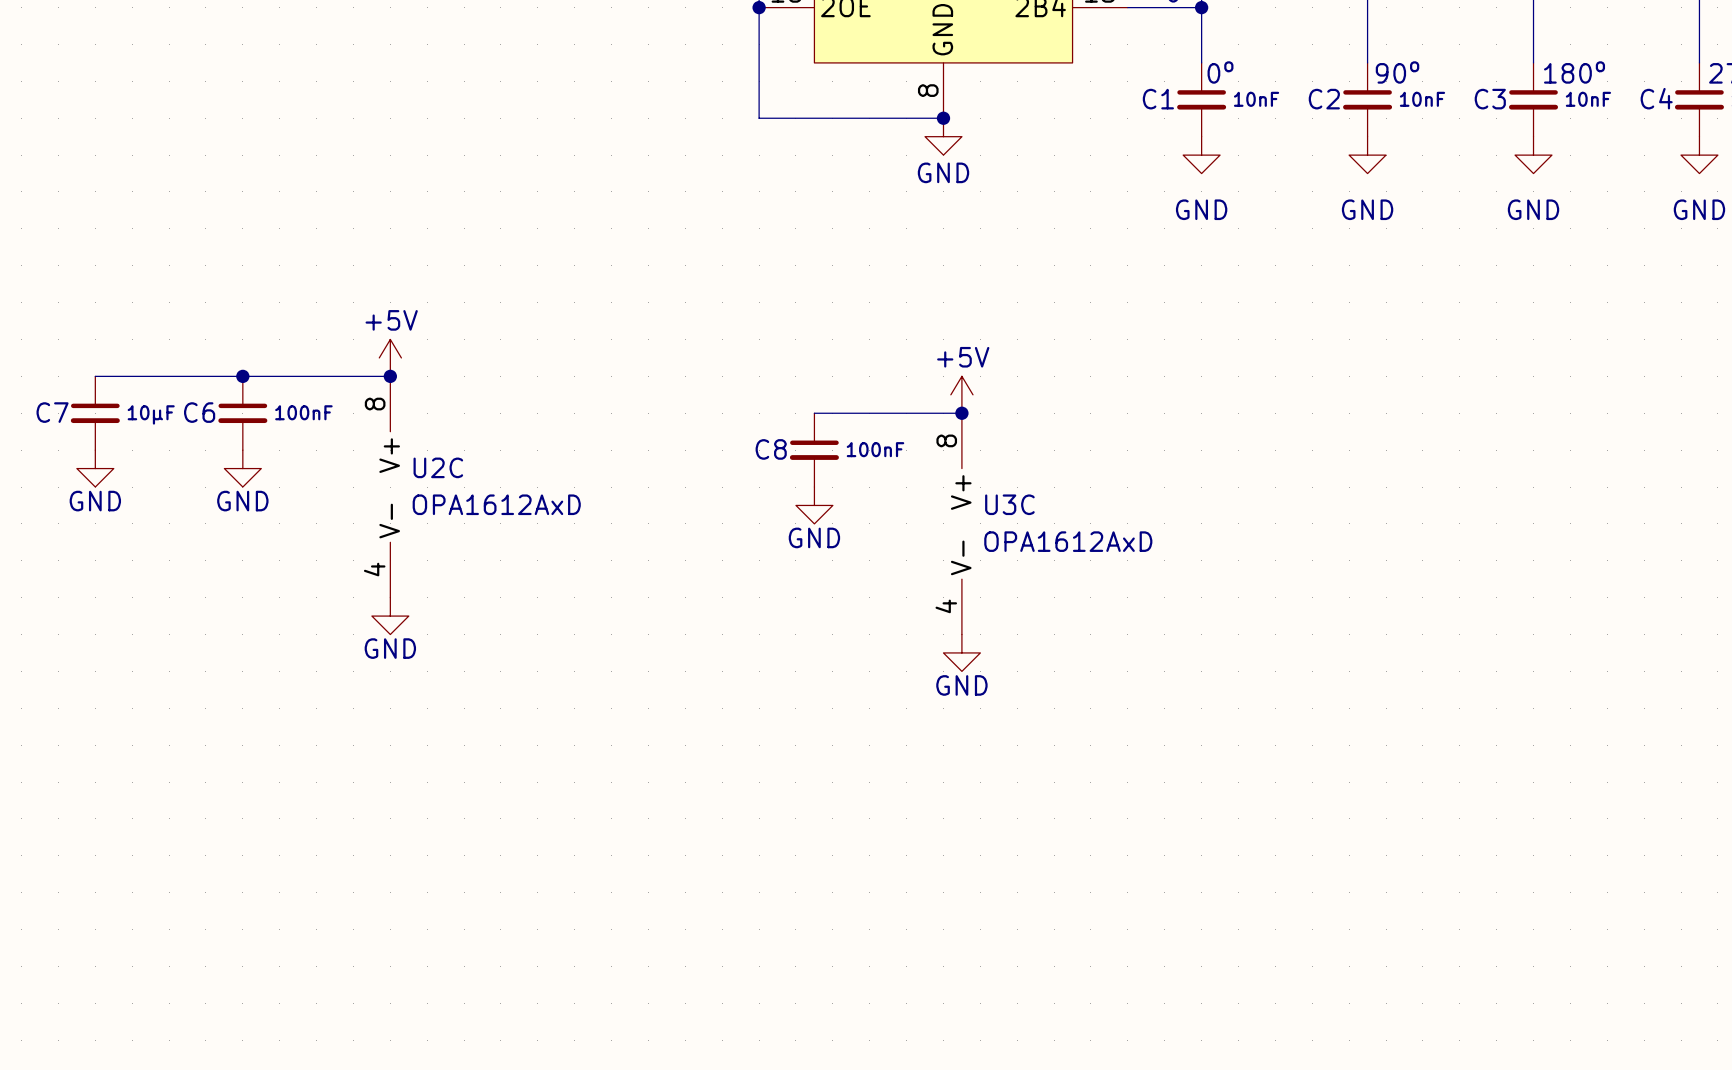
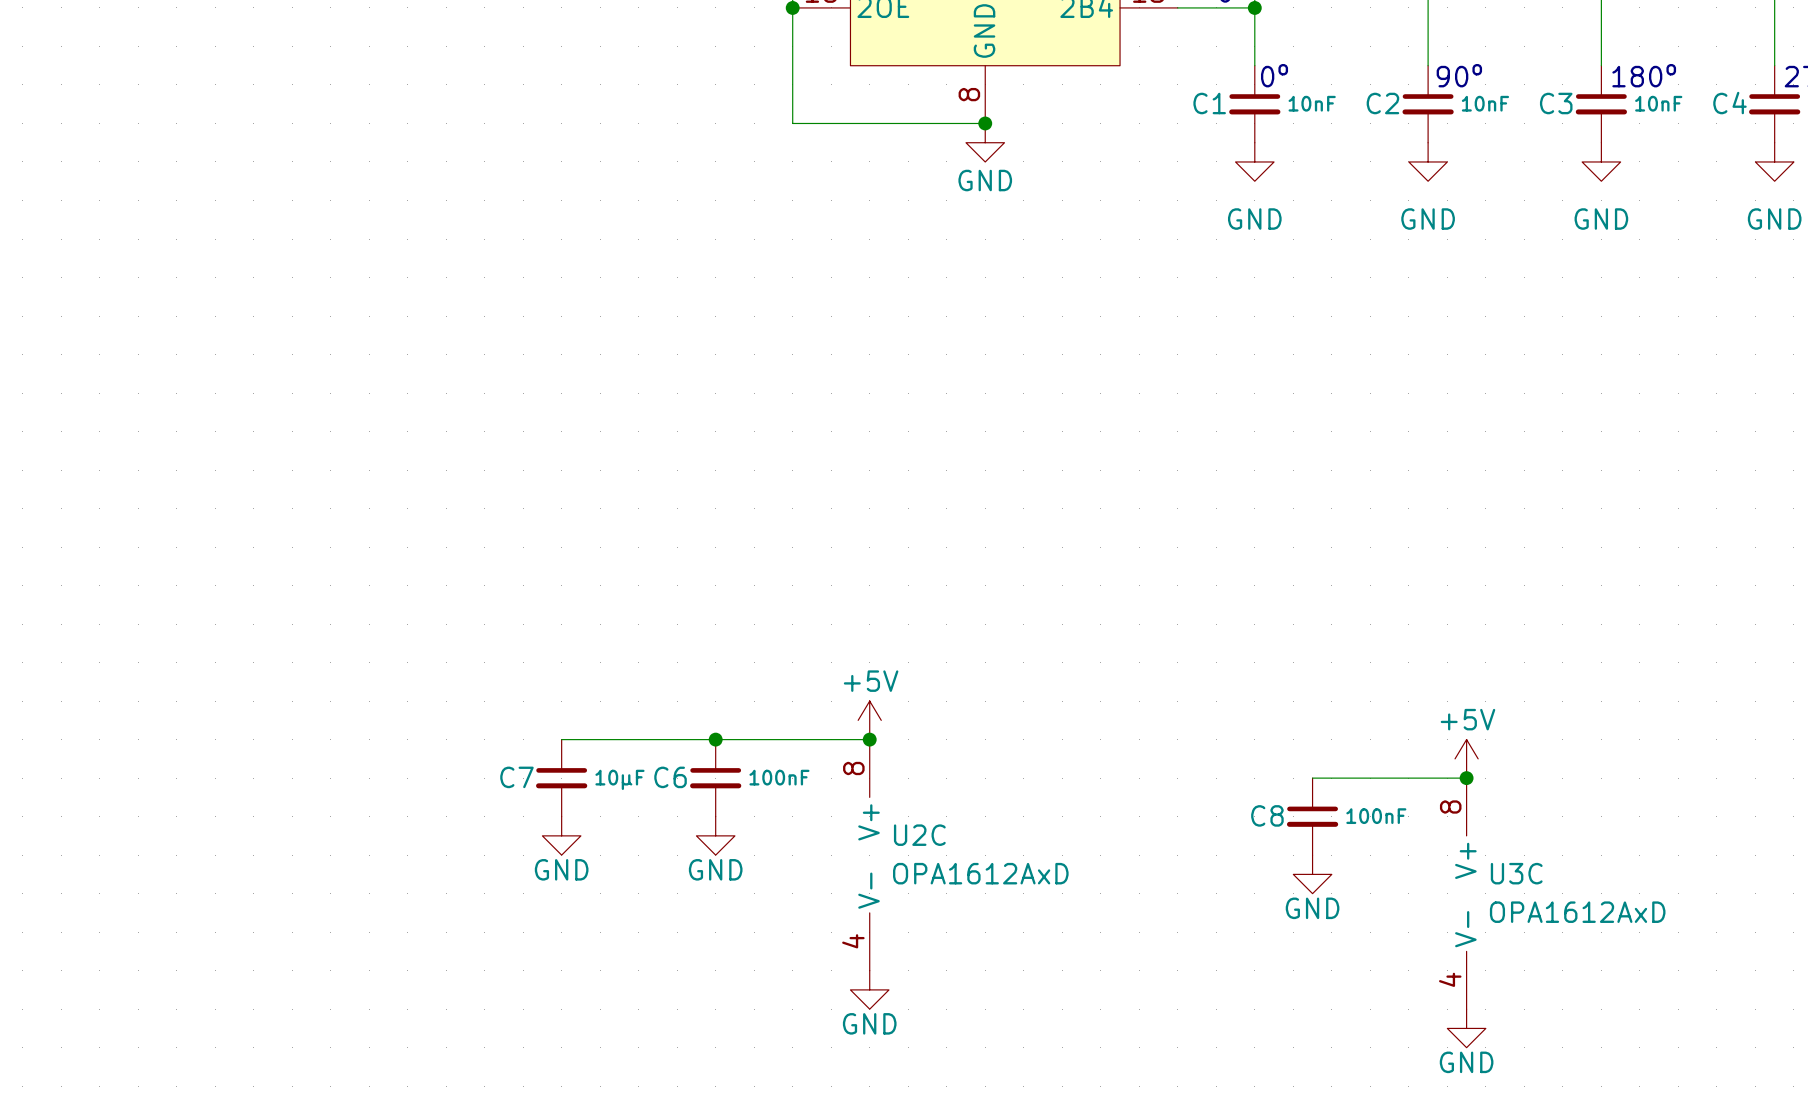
power symbol: +5V (390, 357) -> none
wire: (95, 376) (390, 376) -> none
junction: (242, 376) -> none
junction: (390, 376) -> none
power symbol: +5V (961, 394) -> none
C7 position: (95, 413) -> (561, 778)
C6 position: (242, 413) -> (715, 778)
wire: (814, 413) (961, 413) -> none
junction: (961, 413) -> none
C8 position: (814, 450) -> (1312, 816)
power symbol: GND (95, 468) -> none
power symbol: GND (242, 468) -> none
U2C position: (390, 487) -> (869, 855)
power symbol: GND (814, 505) -> none
U3C position: (961, 523) -> (1466, 893)
power symbol: GND (390, 616) -> none
power symbol: GND (961, 652) -> none
power symbol: none -> +5V (869, 720)
wire: none -> (561, 739) (869, 739)
junction: none -> (715, 739)
junction: none -> (869, 739)
power symbol: none -> +5V (1466, 758)
wire: none -> (1312, 778) (1466, 778)
junction: none -> (1466, 778)
power symbol: none -> GND (561, 835)
power symbol: none -> GND (715, 835)
power symbol: none -> GND (1312, 874)
power symbol: none -> GND (869, 989)
power symbol: none -> GND (1466, 1028)

